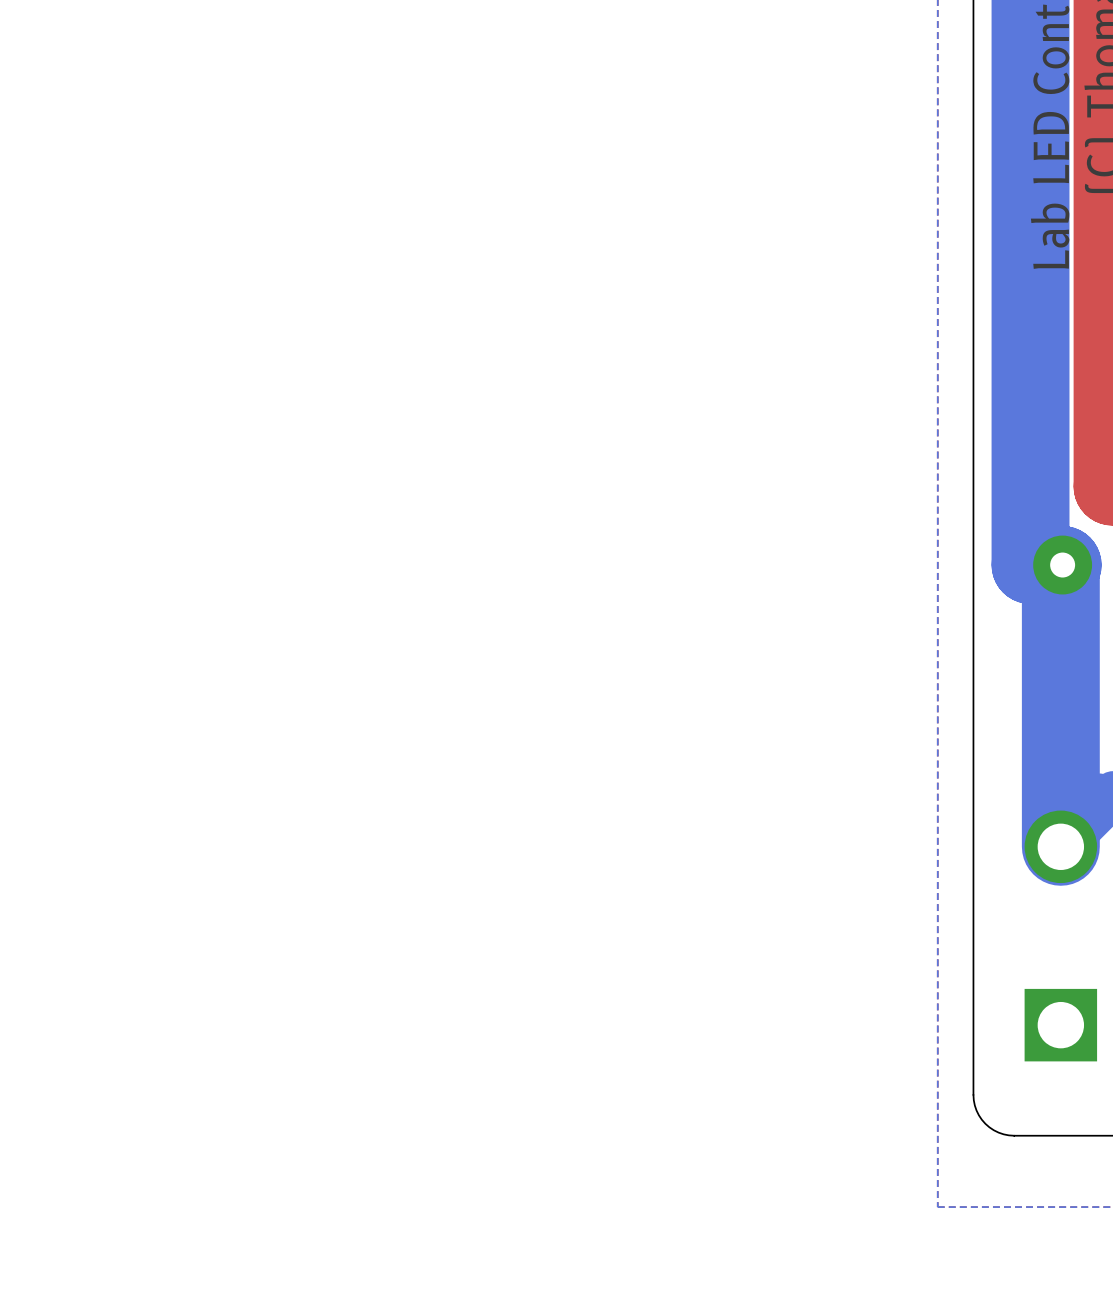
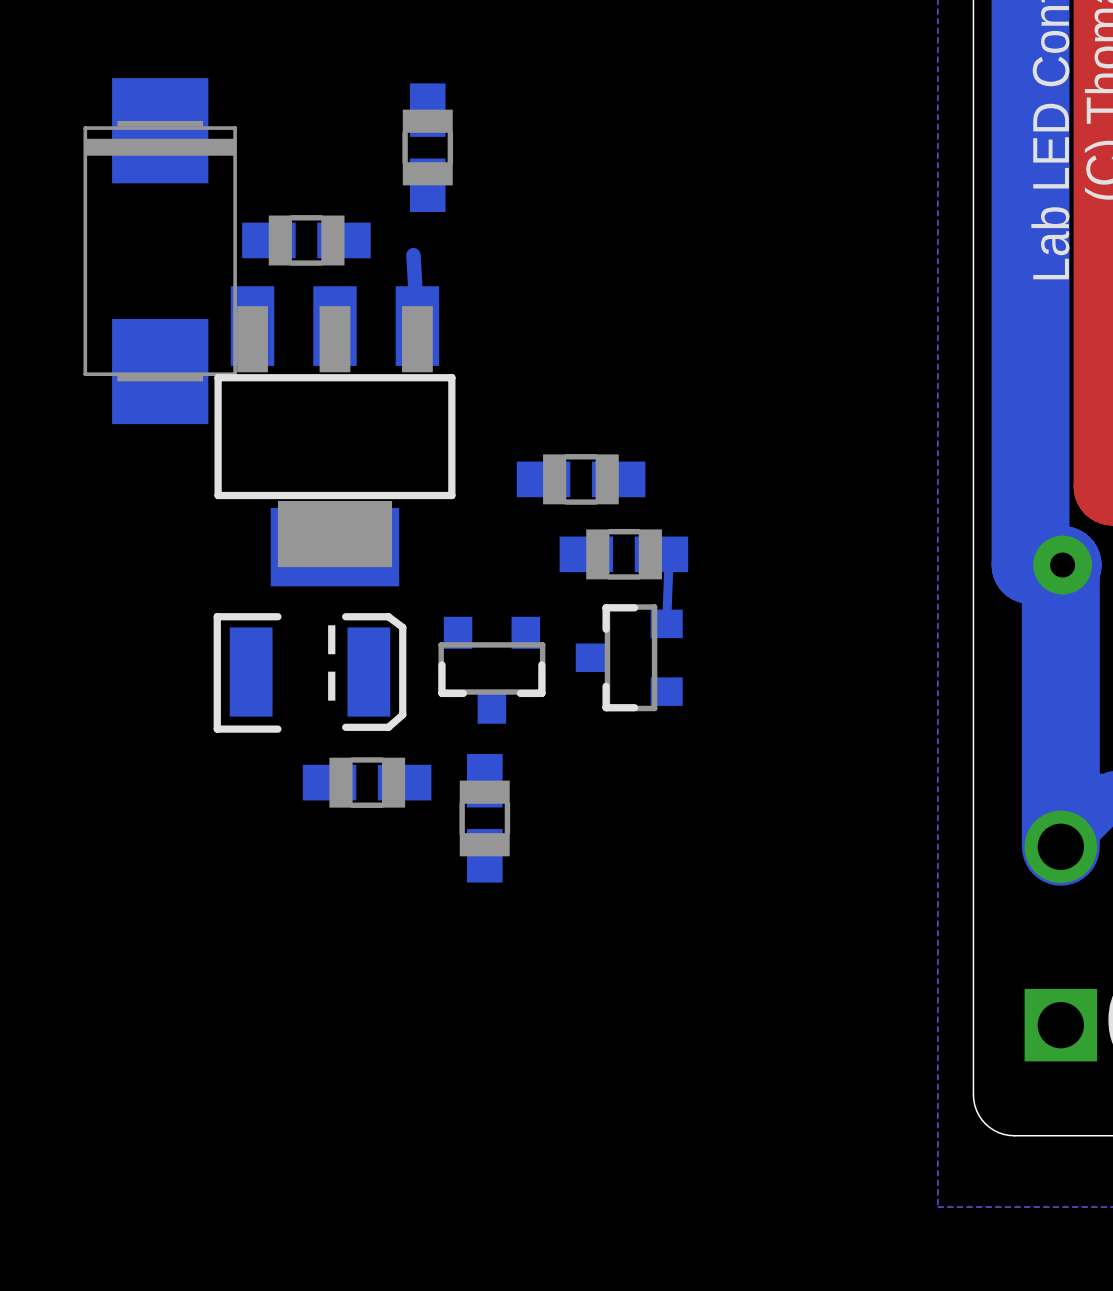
part: none -> (427, 147)
part: none -> (306, 240)
part: none -> (160, 251)
bottom track: none -> (413, 255) (417, 326)
part: none -> (334, 436)
part: none -> (581, 479)
part: none -> (623, 554)
bottom track: none -> (661, 554) (668, 572) (666, 623) (661, 623)
part: none -> (629, 657)
part: none -> (491, 670)
part: none -> (310, 672)
part: none -> (367, 782)
part: none -> (484, 818)

